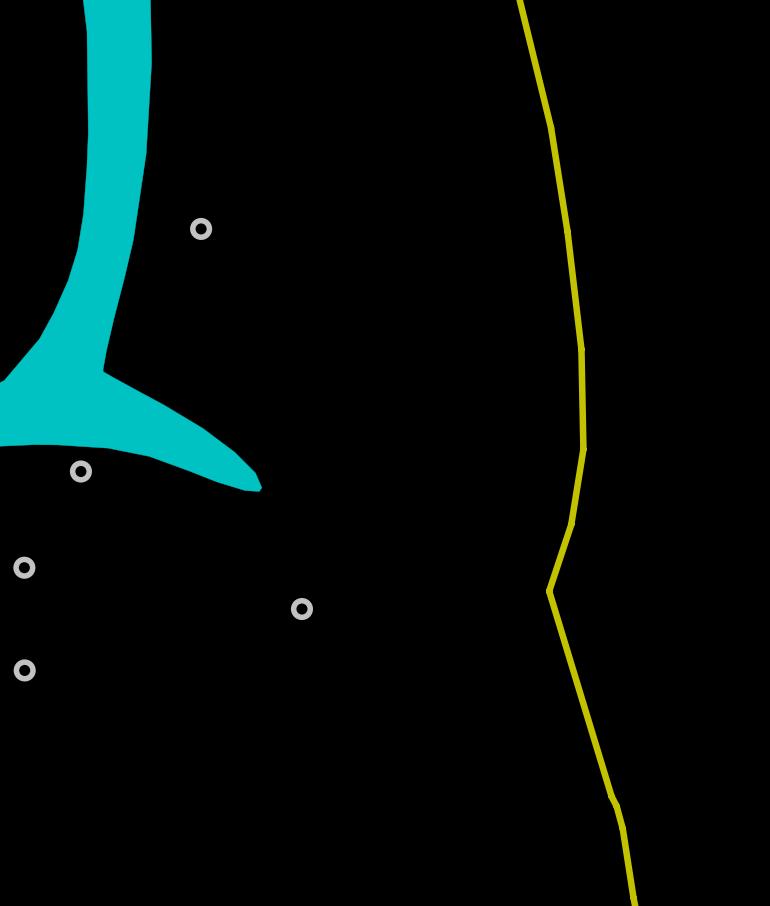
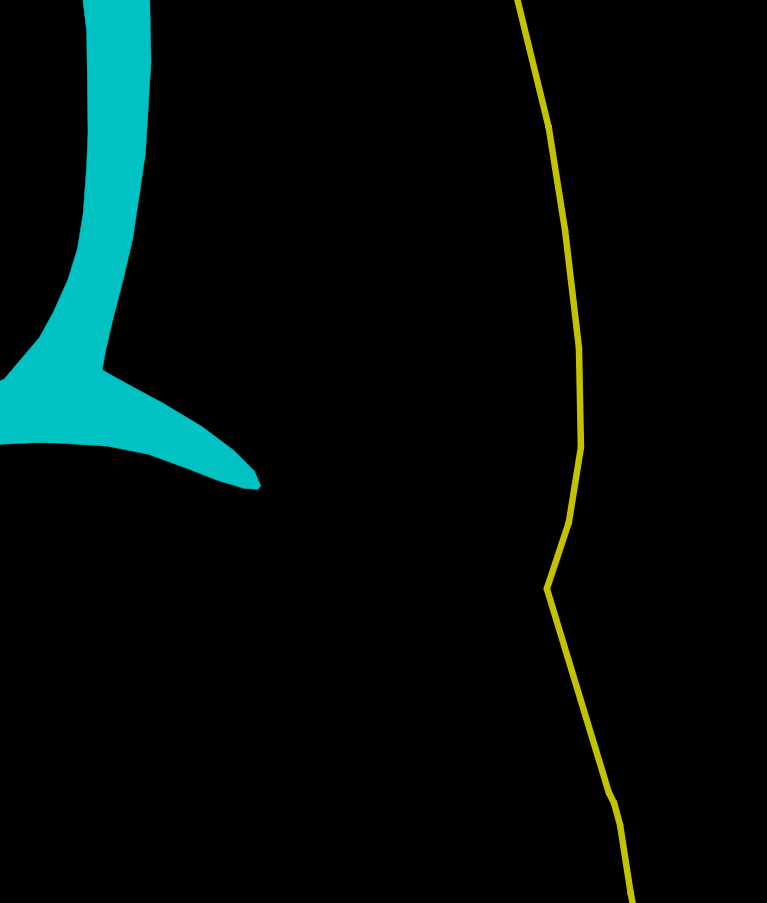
via: (201, 228) -> none
via: (80, 471) -> none
via: (24, 567) -> none
via: (301, 609) -> none
via: (24, 670) -> none

